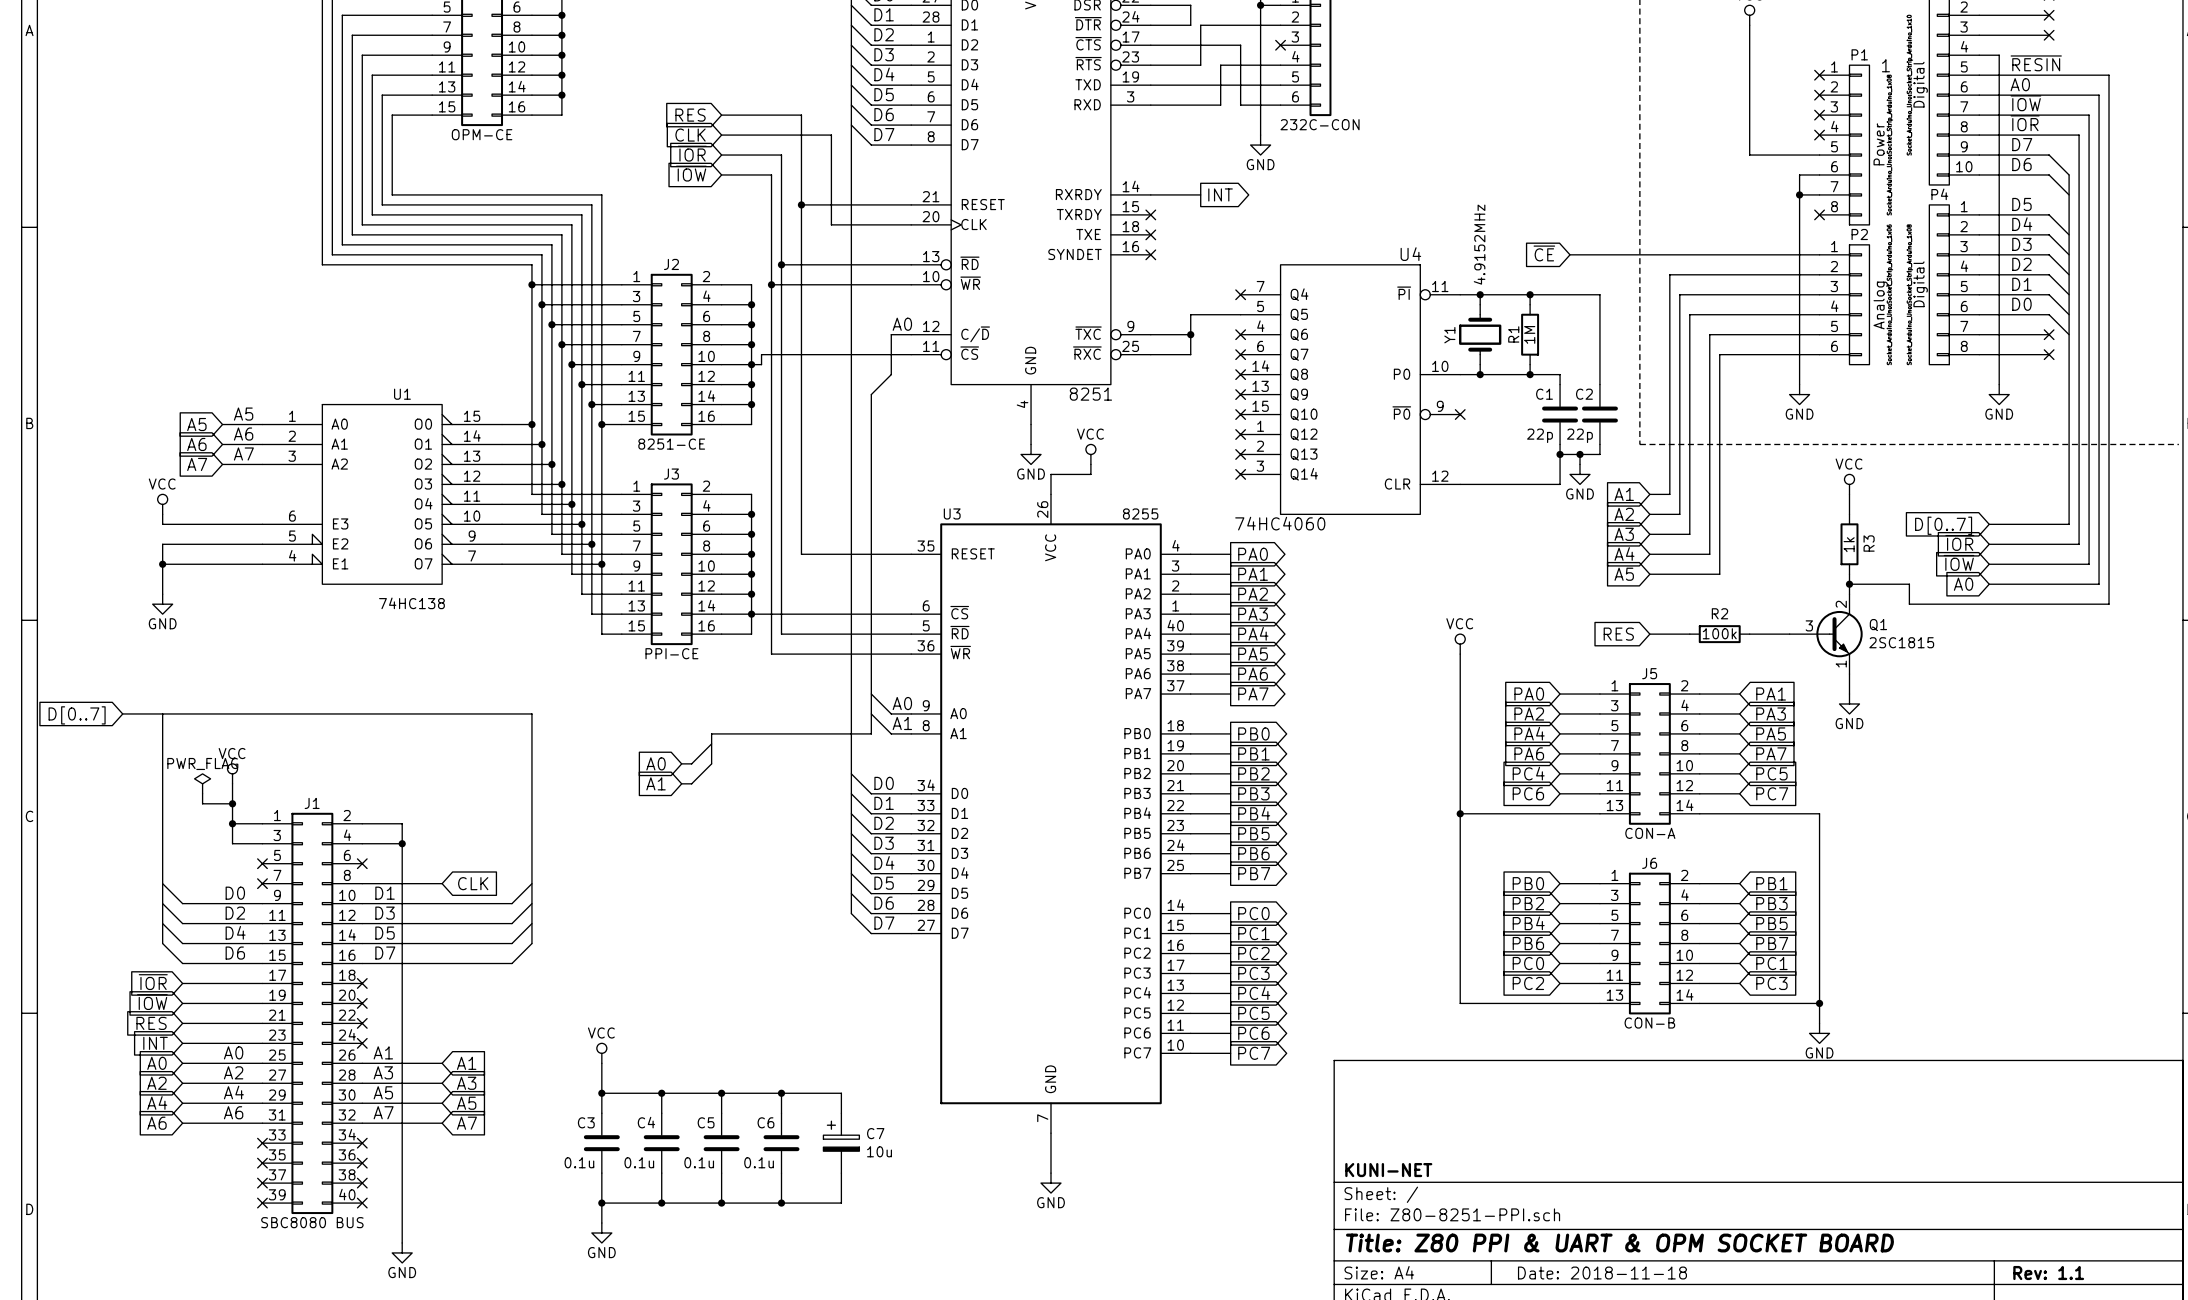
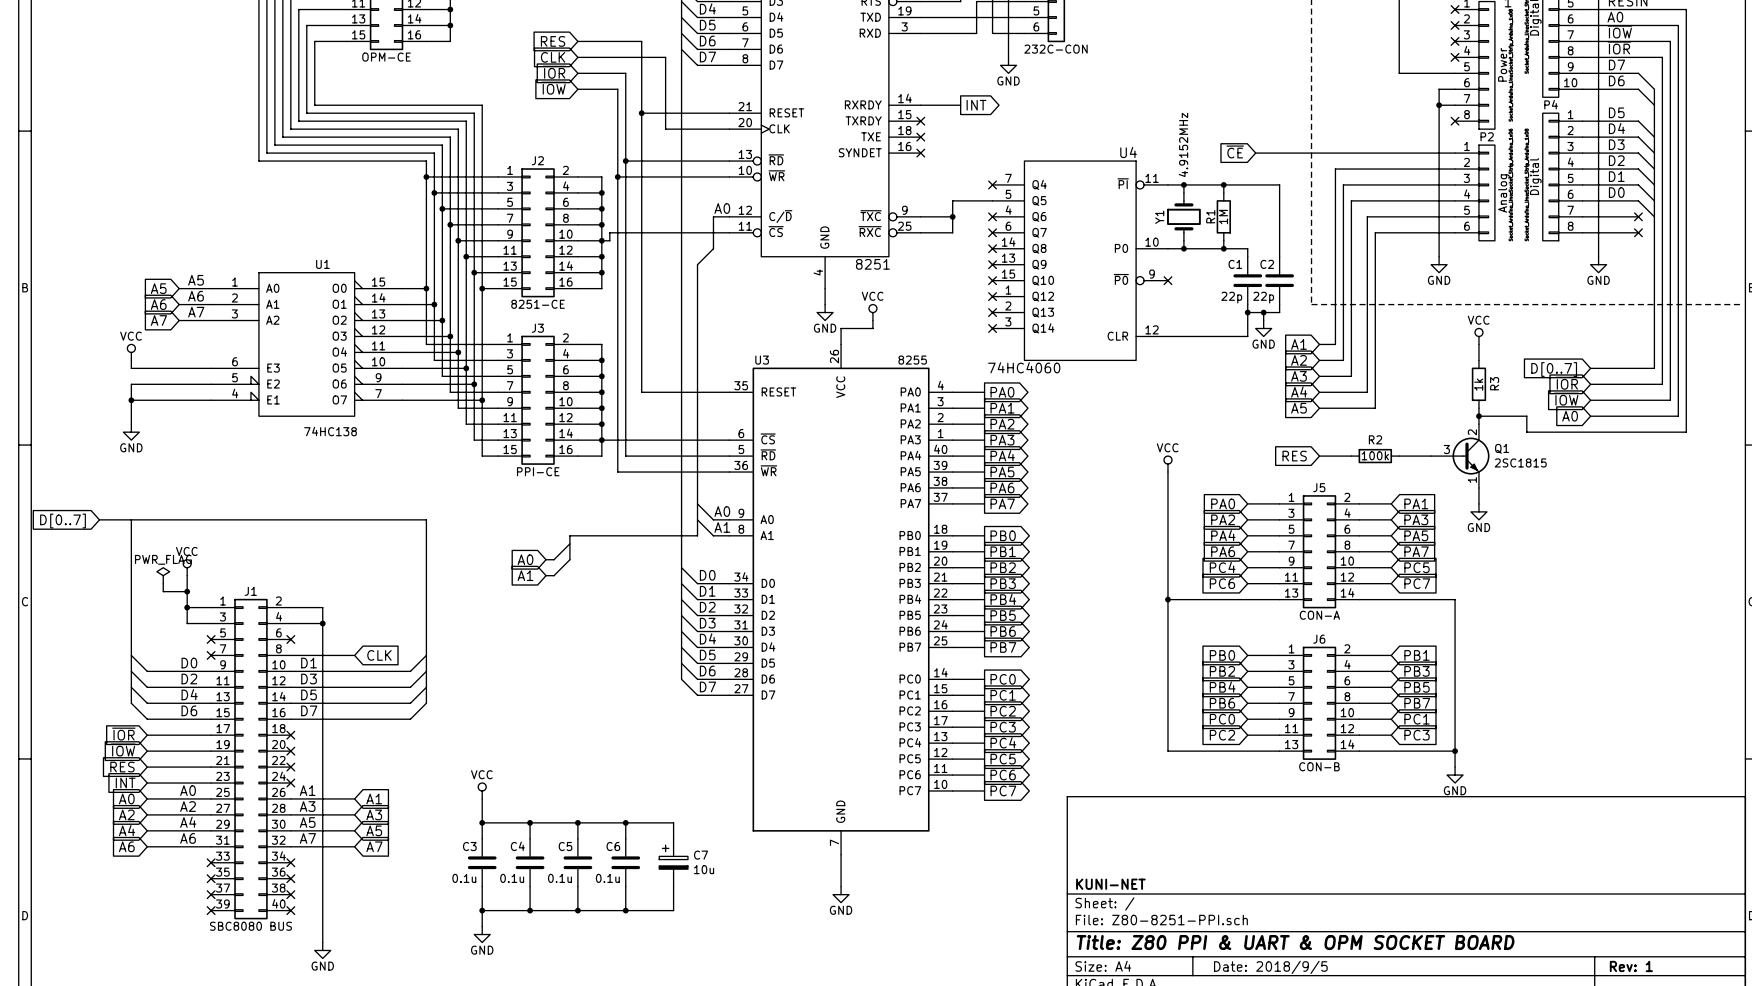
title block: Date: 2018-11-18 (1602, 1273) -> Date: 2018/9/5 (1270, 967)
title block: Rev: 1.1 (2048, 1273) -> Rev: 1 (1631, 966)

